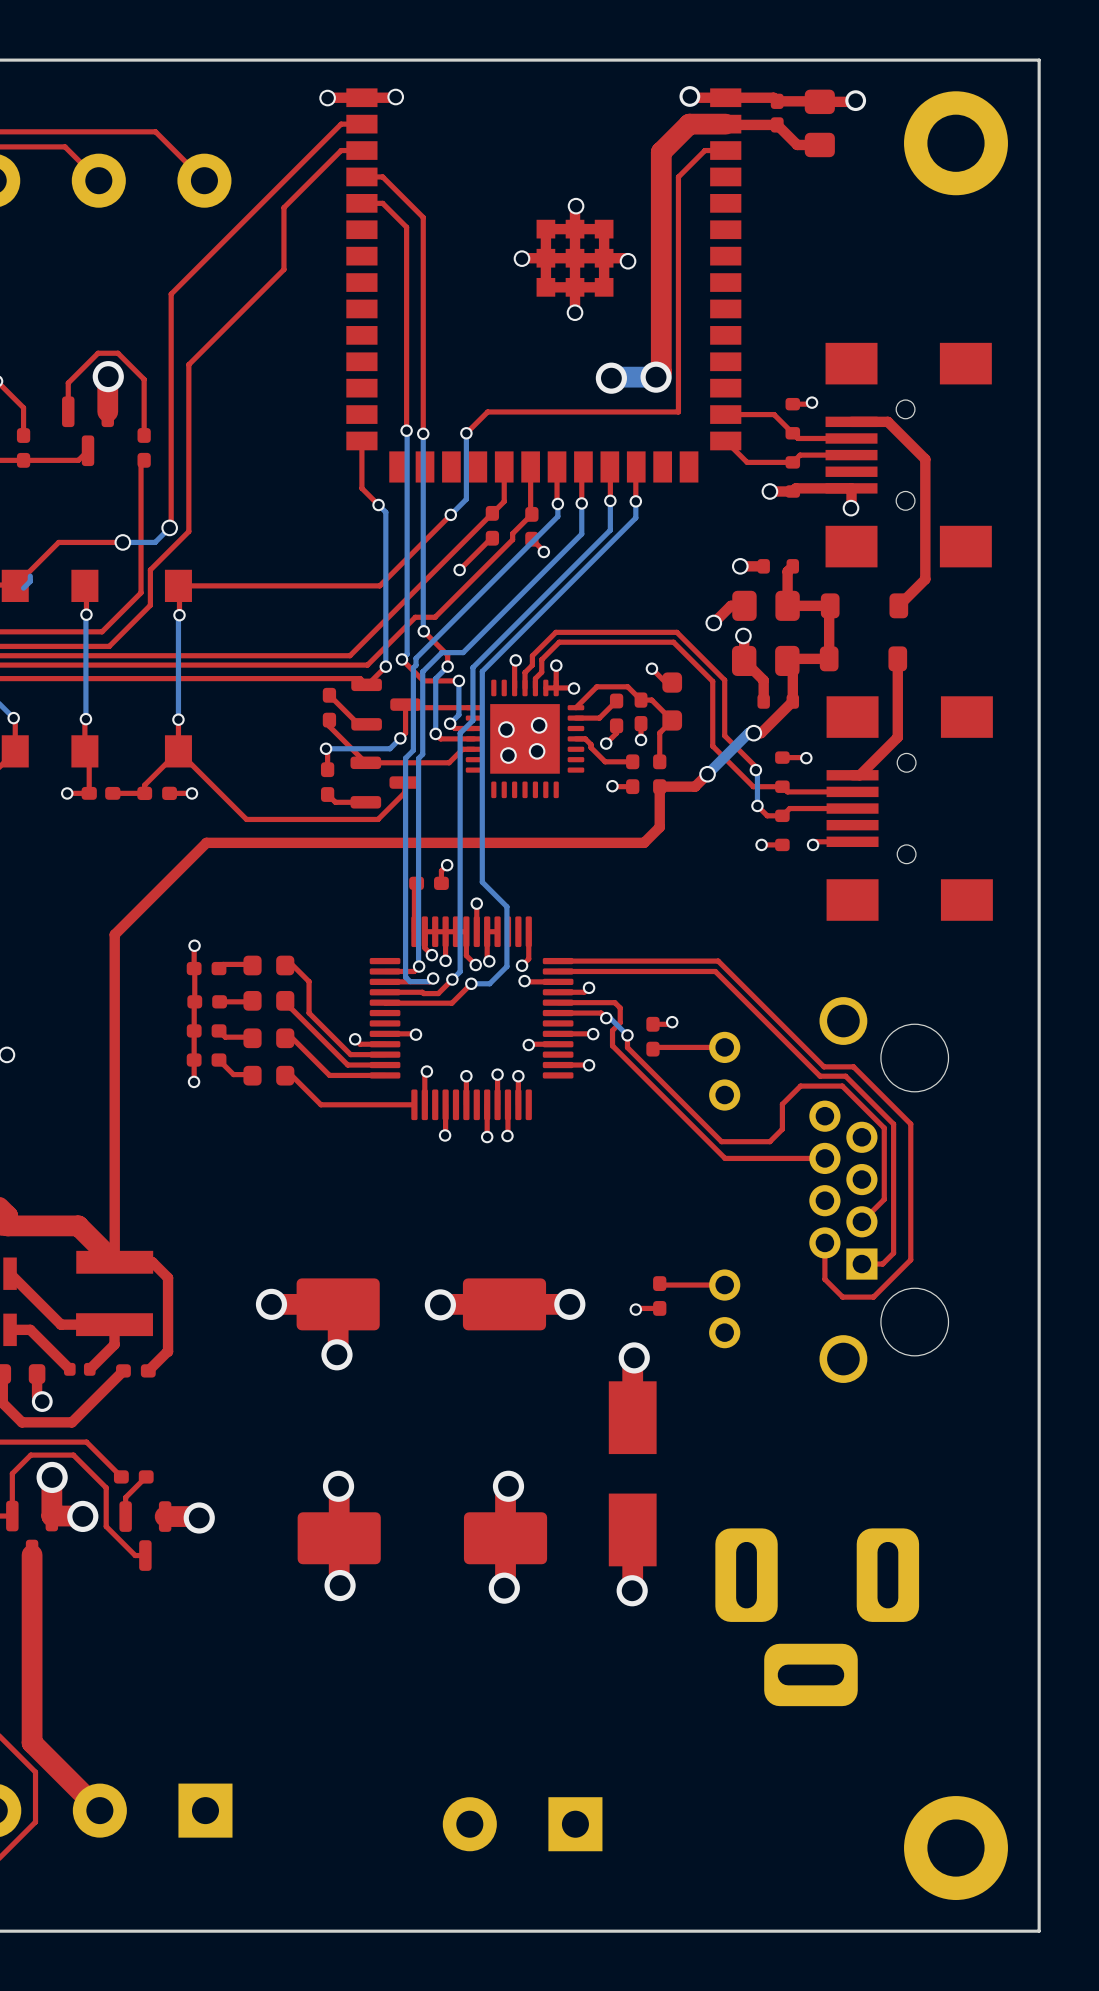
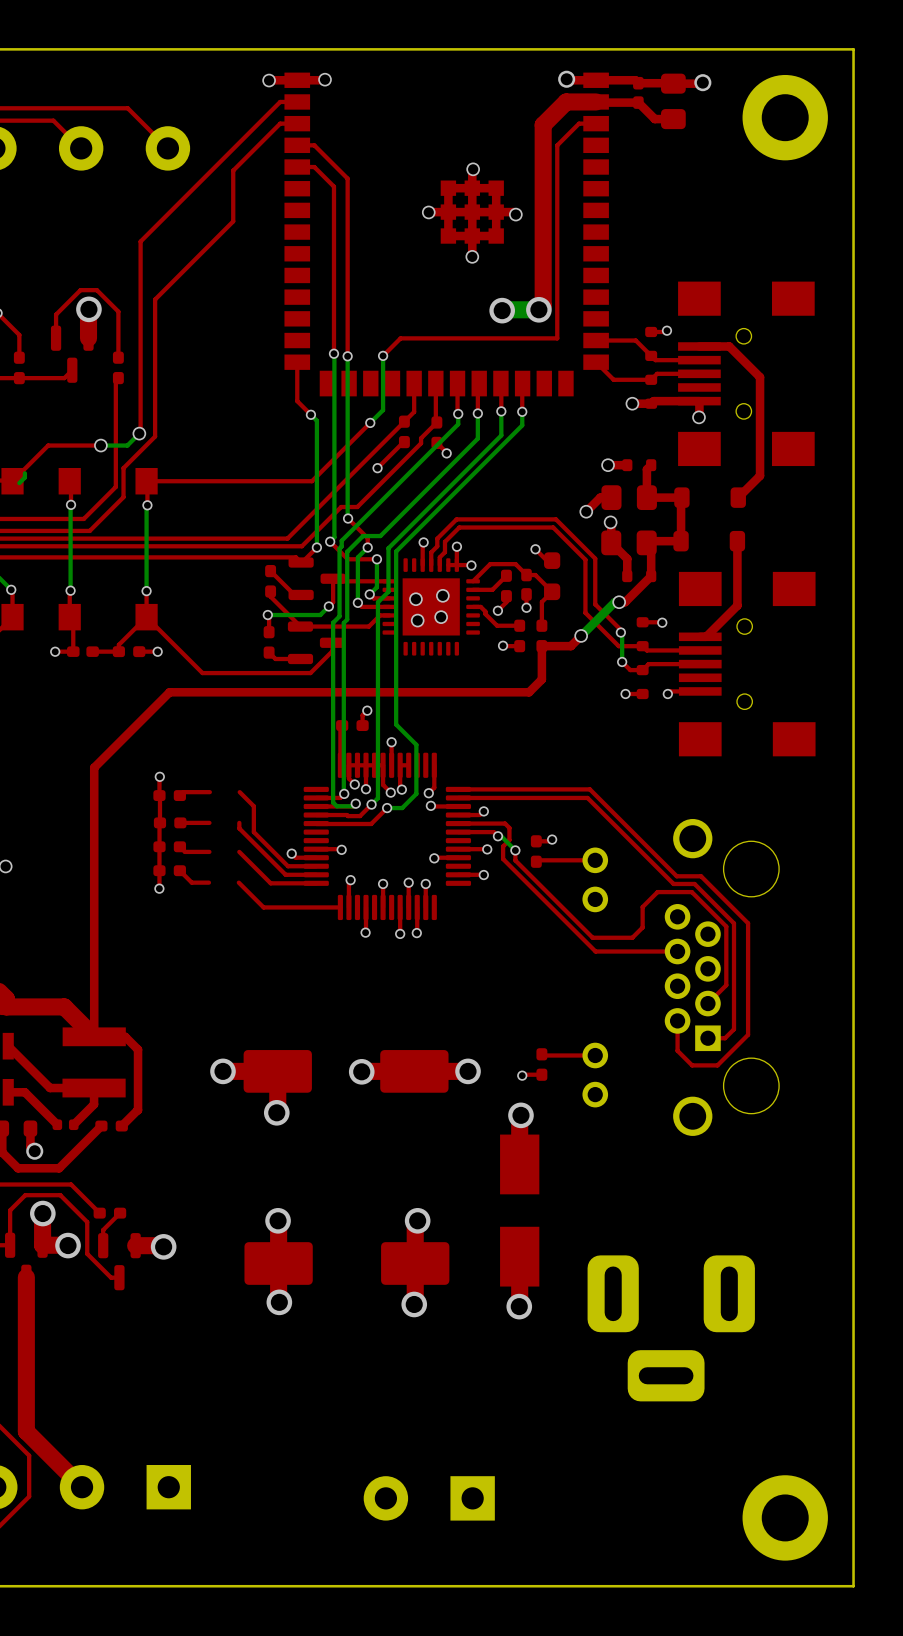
part: (268, 965) -> none
part: (268, 1000) -> none
part: (268, 1038) -> none
part: (268, 1075) -> none

